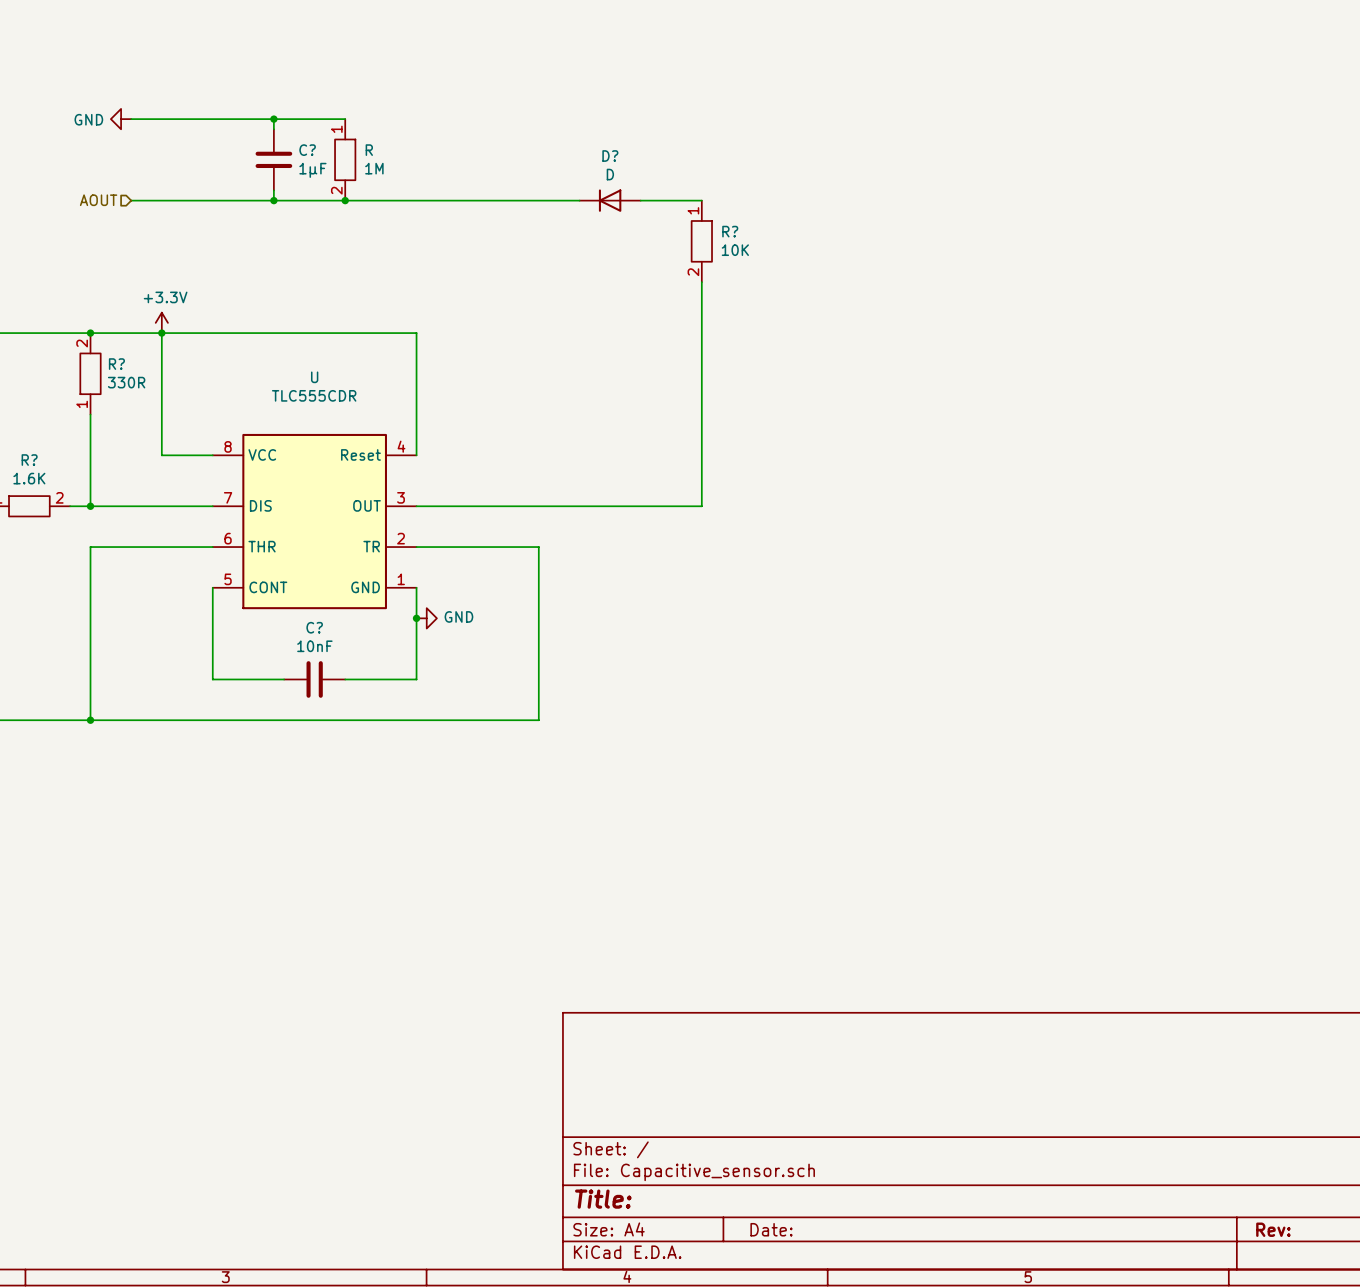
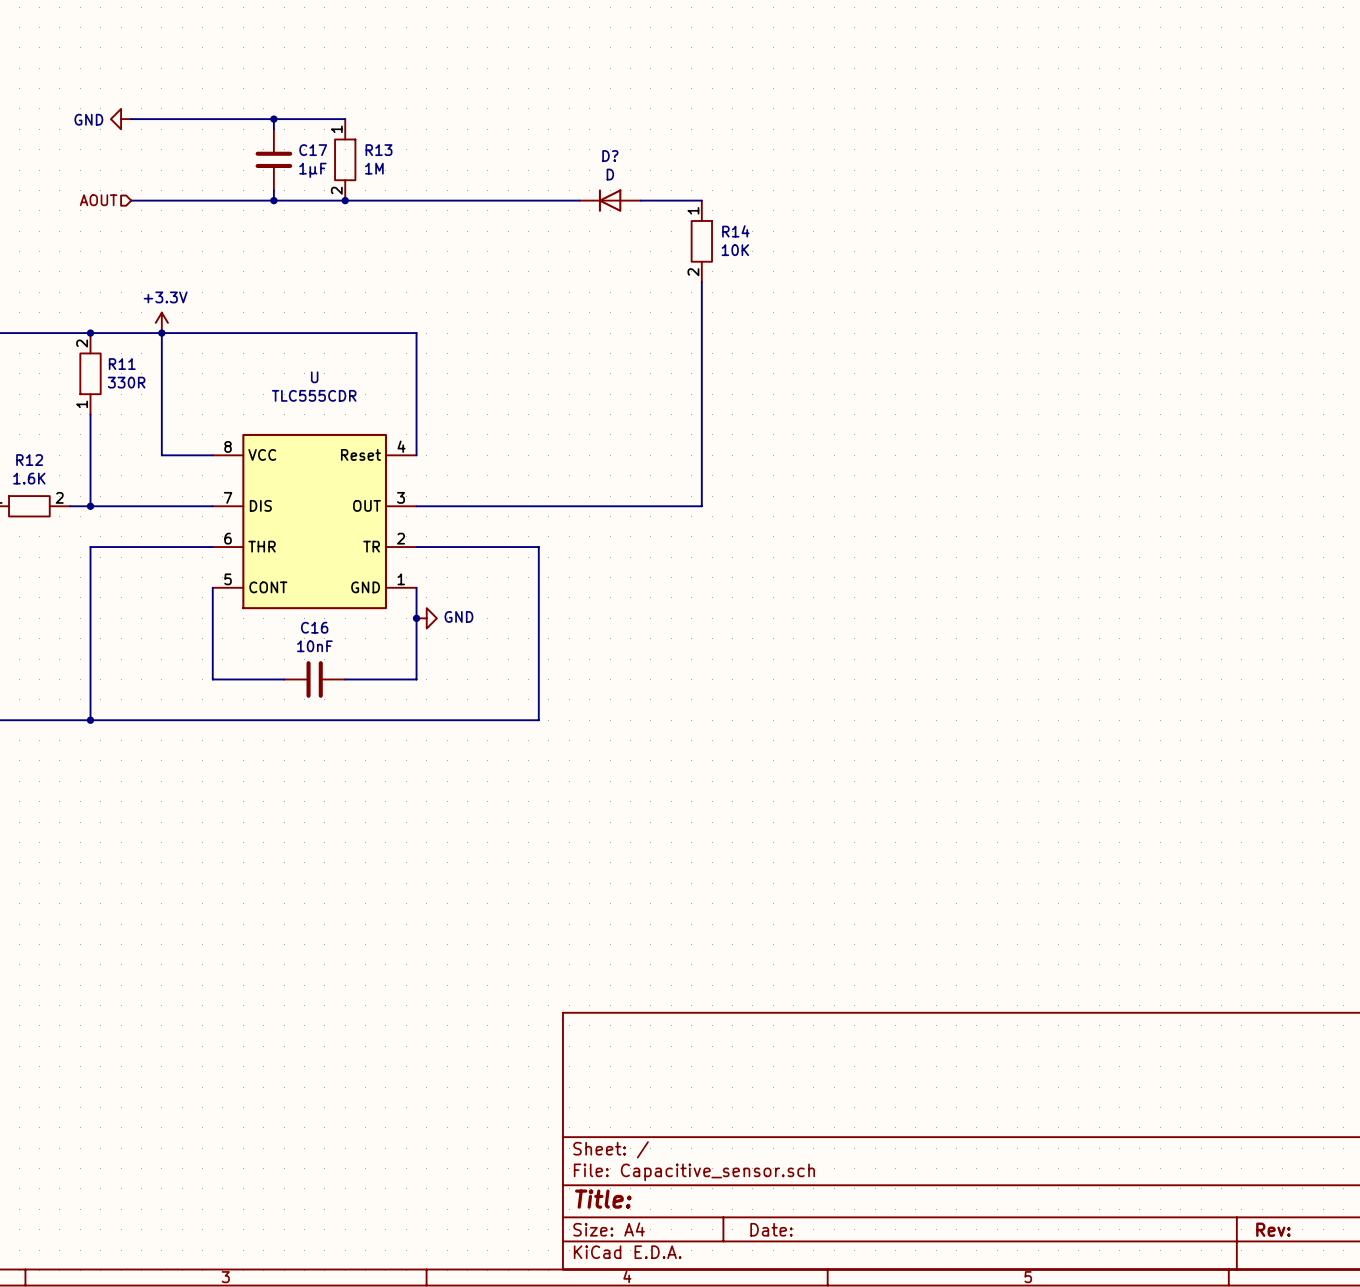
C? name: C? (307, 150) -> C17 (313, 150)
R name: R (369, 150) -> R13 (379, 150)
R? name: R? (730, 231) -> R14 (735, 231)
R? name: R? (116, 364) -> R11 (122, 364)
R? name: R? (29, 460) -> R12 (29, 460)
C? name: C? (314, 627) -> C16 (314, 627)

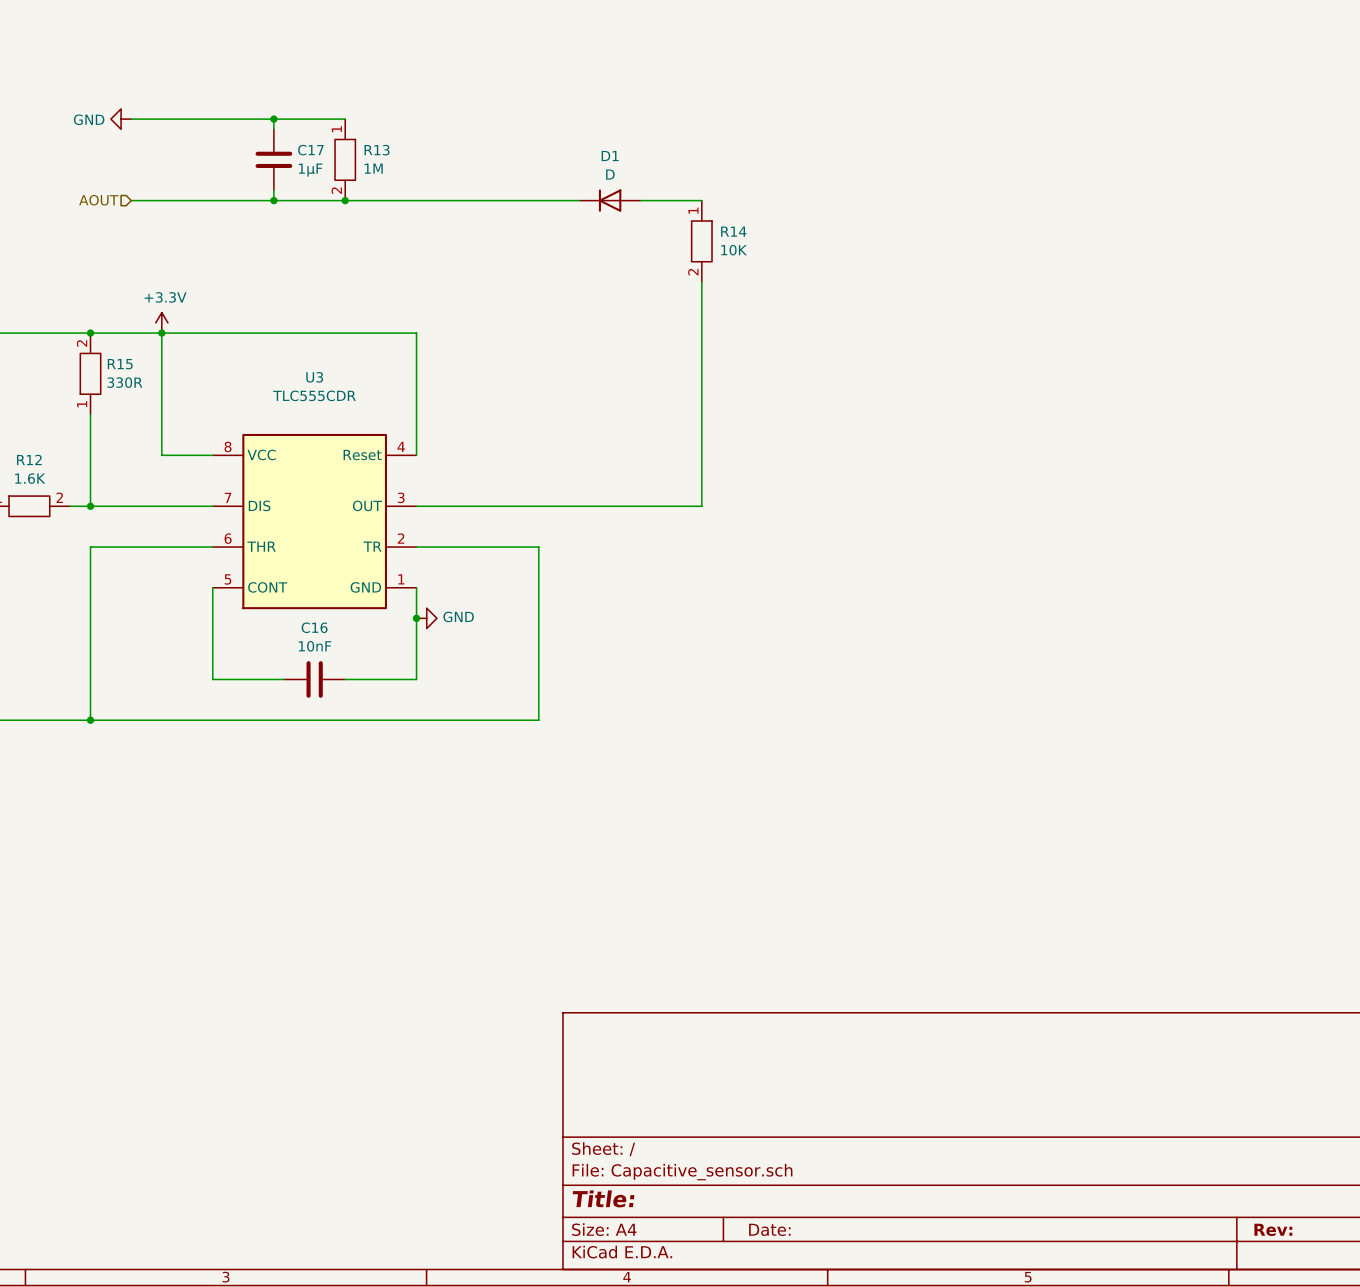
D? name: D? (610, 156) -> D1 (610, 156)
R11 name: R11 (122, 364) -> R15 (120, 364)
U name: U (314, 377) -> U3 (314, 377)

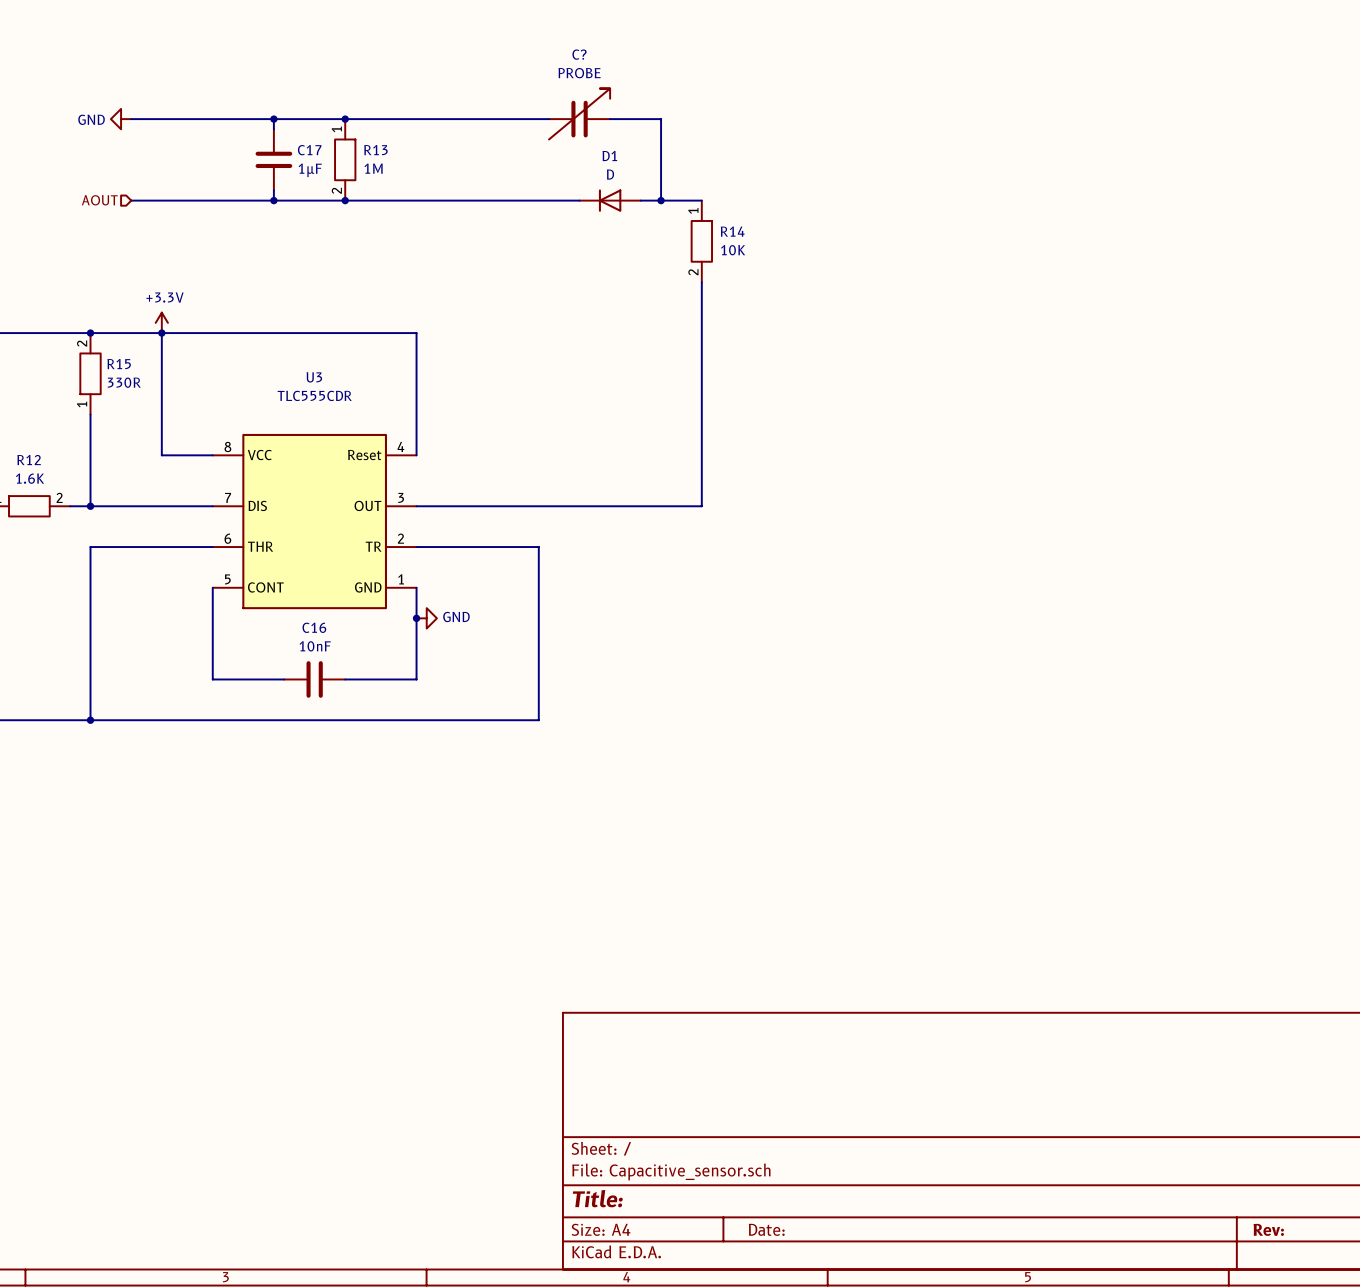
C?: none -> PROBE (579, 114)
wire: none -> (345, 119) (548, 119)
junction: none -> (345, 119)
wire: none -> (610, 119) (661, 119) (661, 200)
junction: none -> (661, 200)

